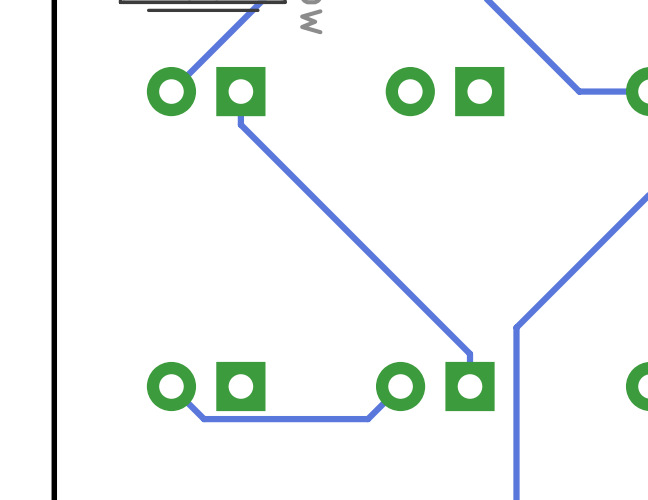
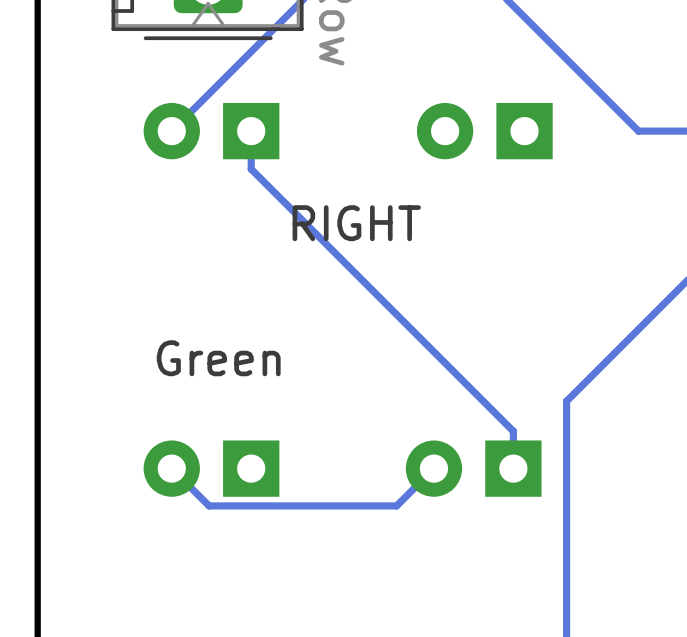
text: none -> RIGHT (356, 223)
text: none -> Green (218, 358)

